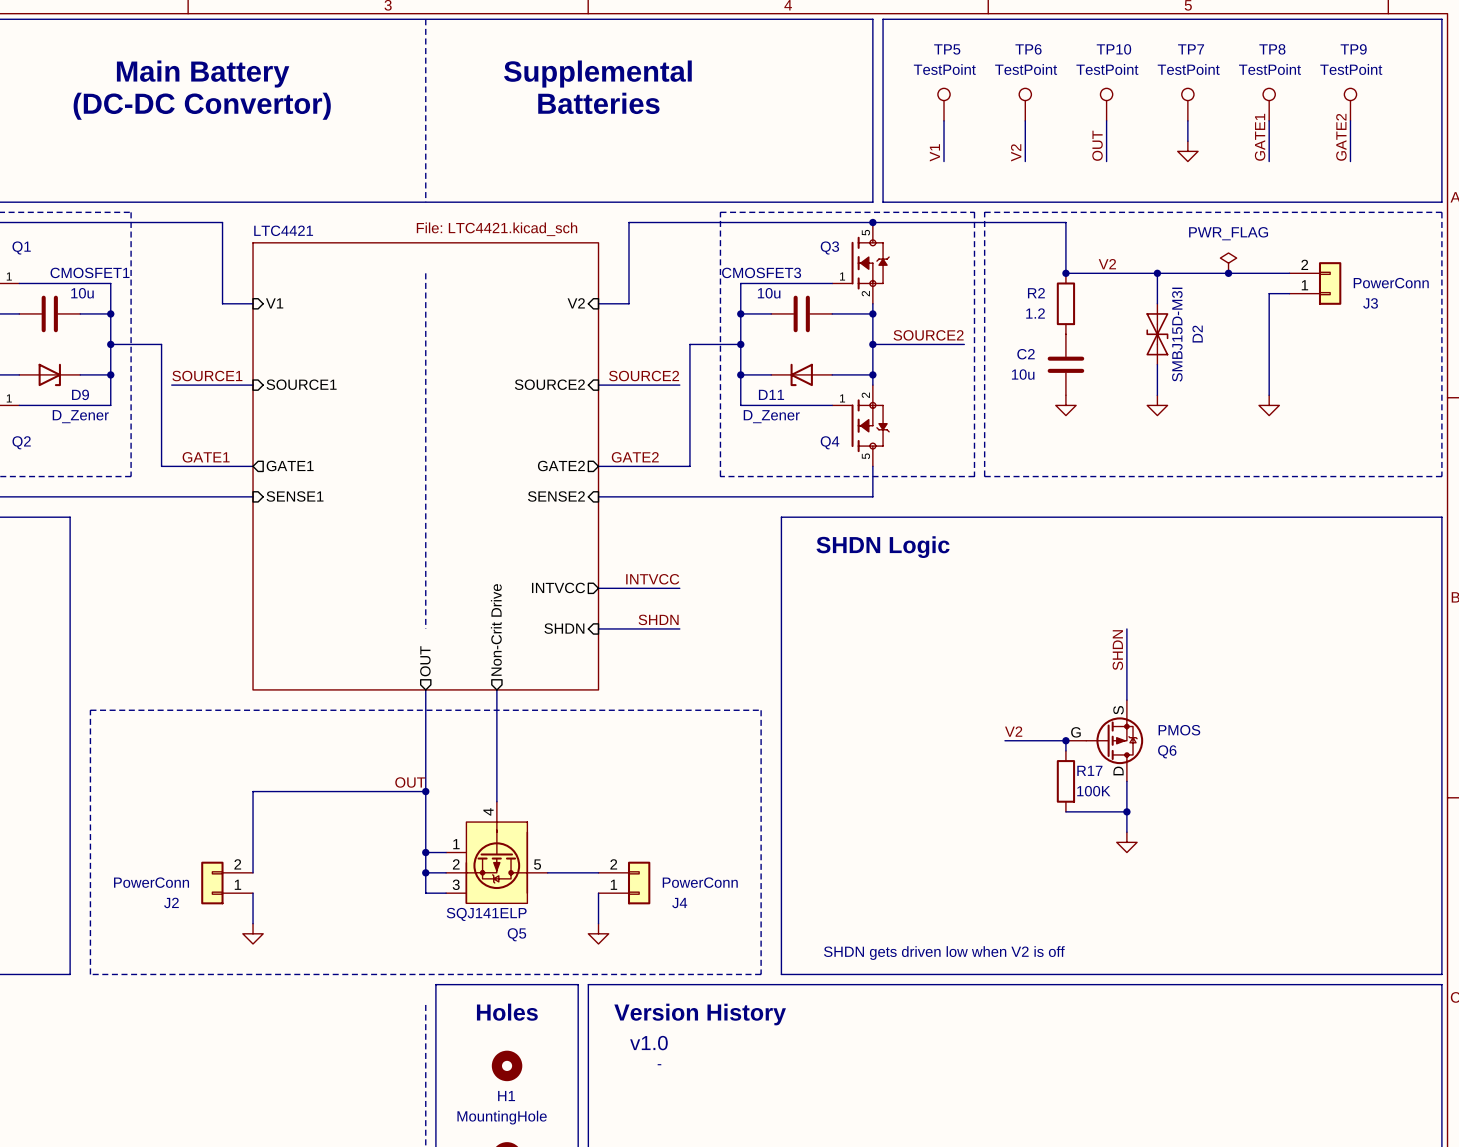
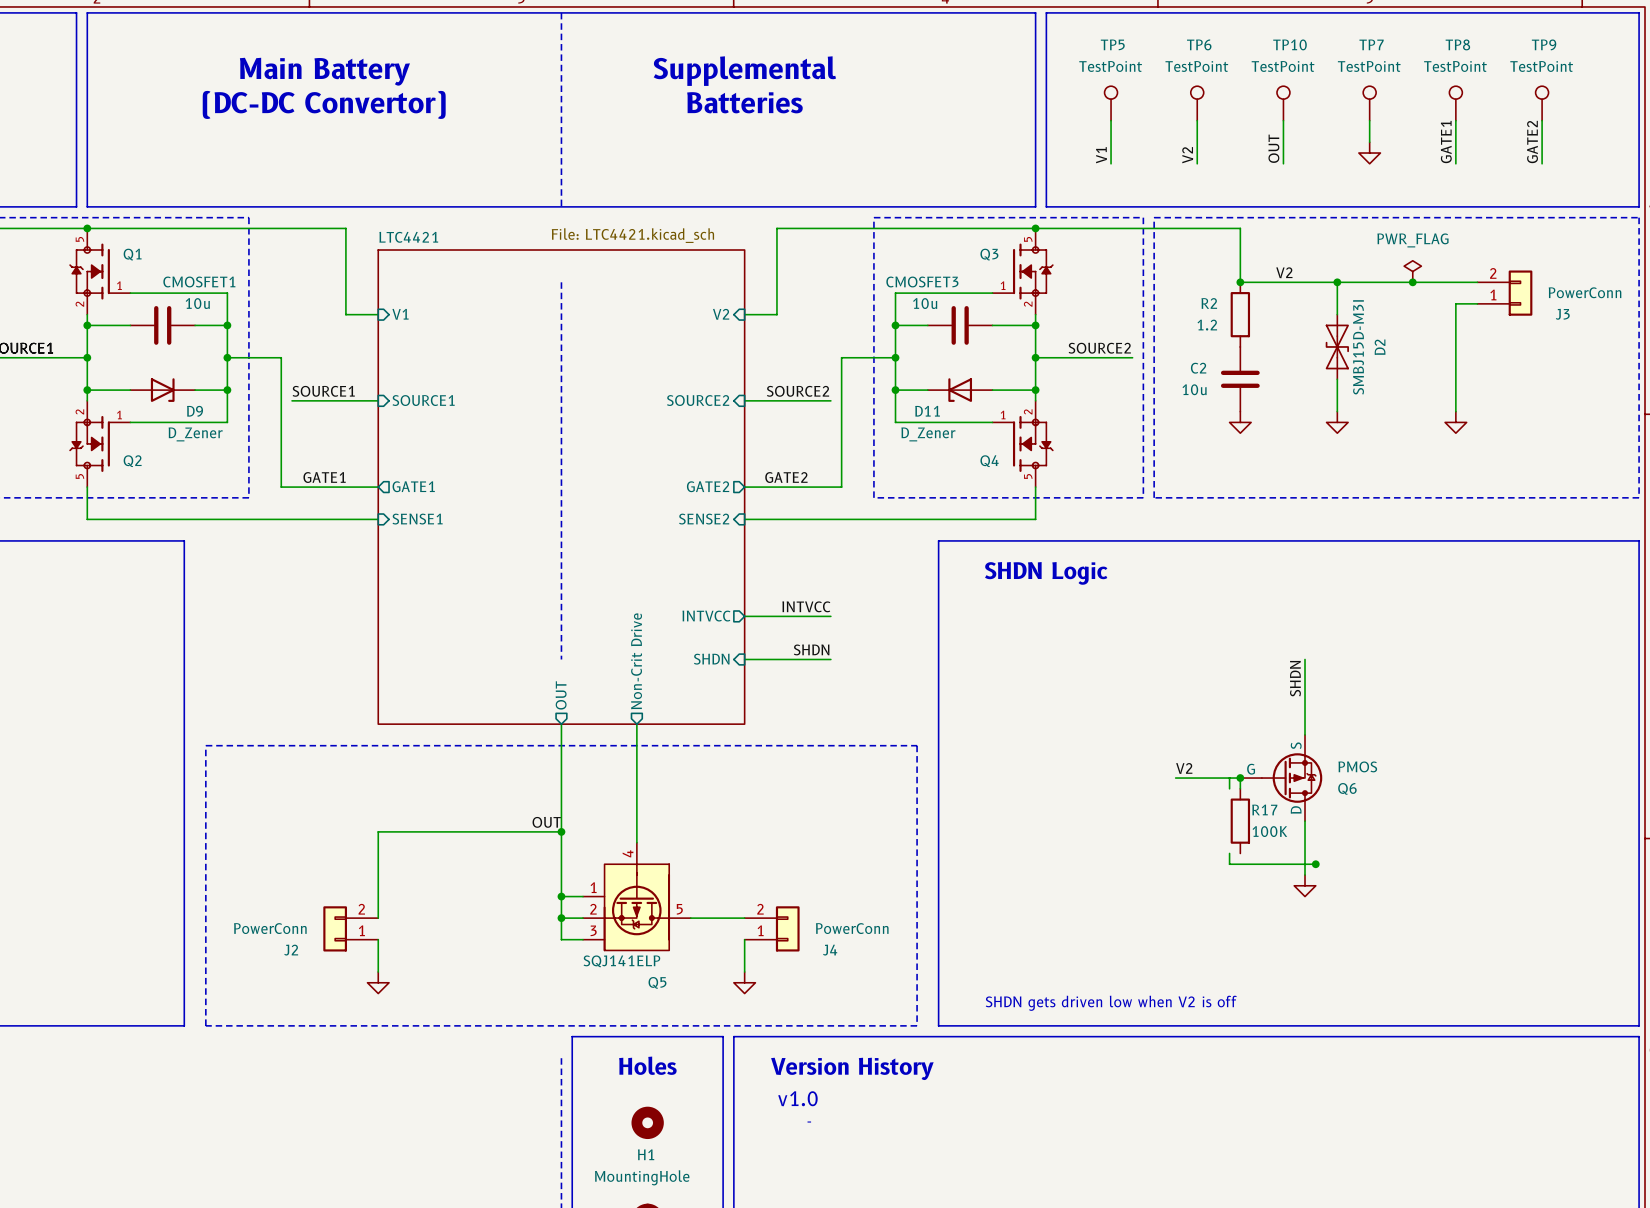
wire: none -> (1229, 778) (1229, 788)
wire: none -> (1229, 853) (1229, 864) (1315, 864)
wire: (1065, 811) (1126, 811) -> none
junction position: (1126, 811) -> (1315, 864)

